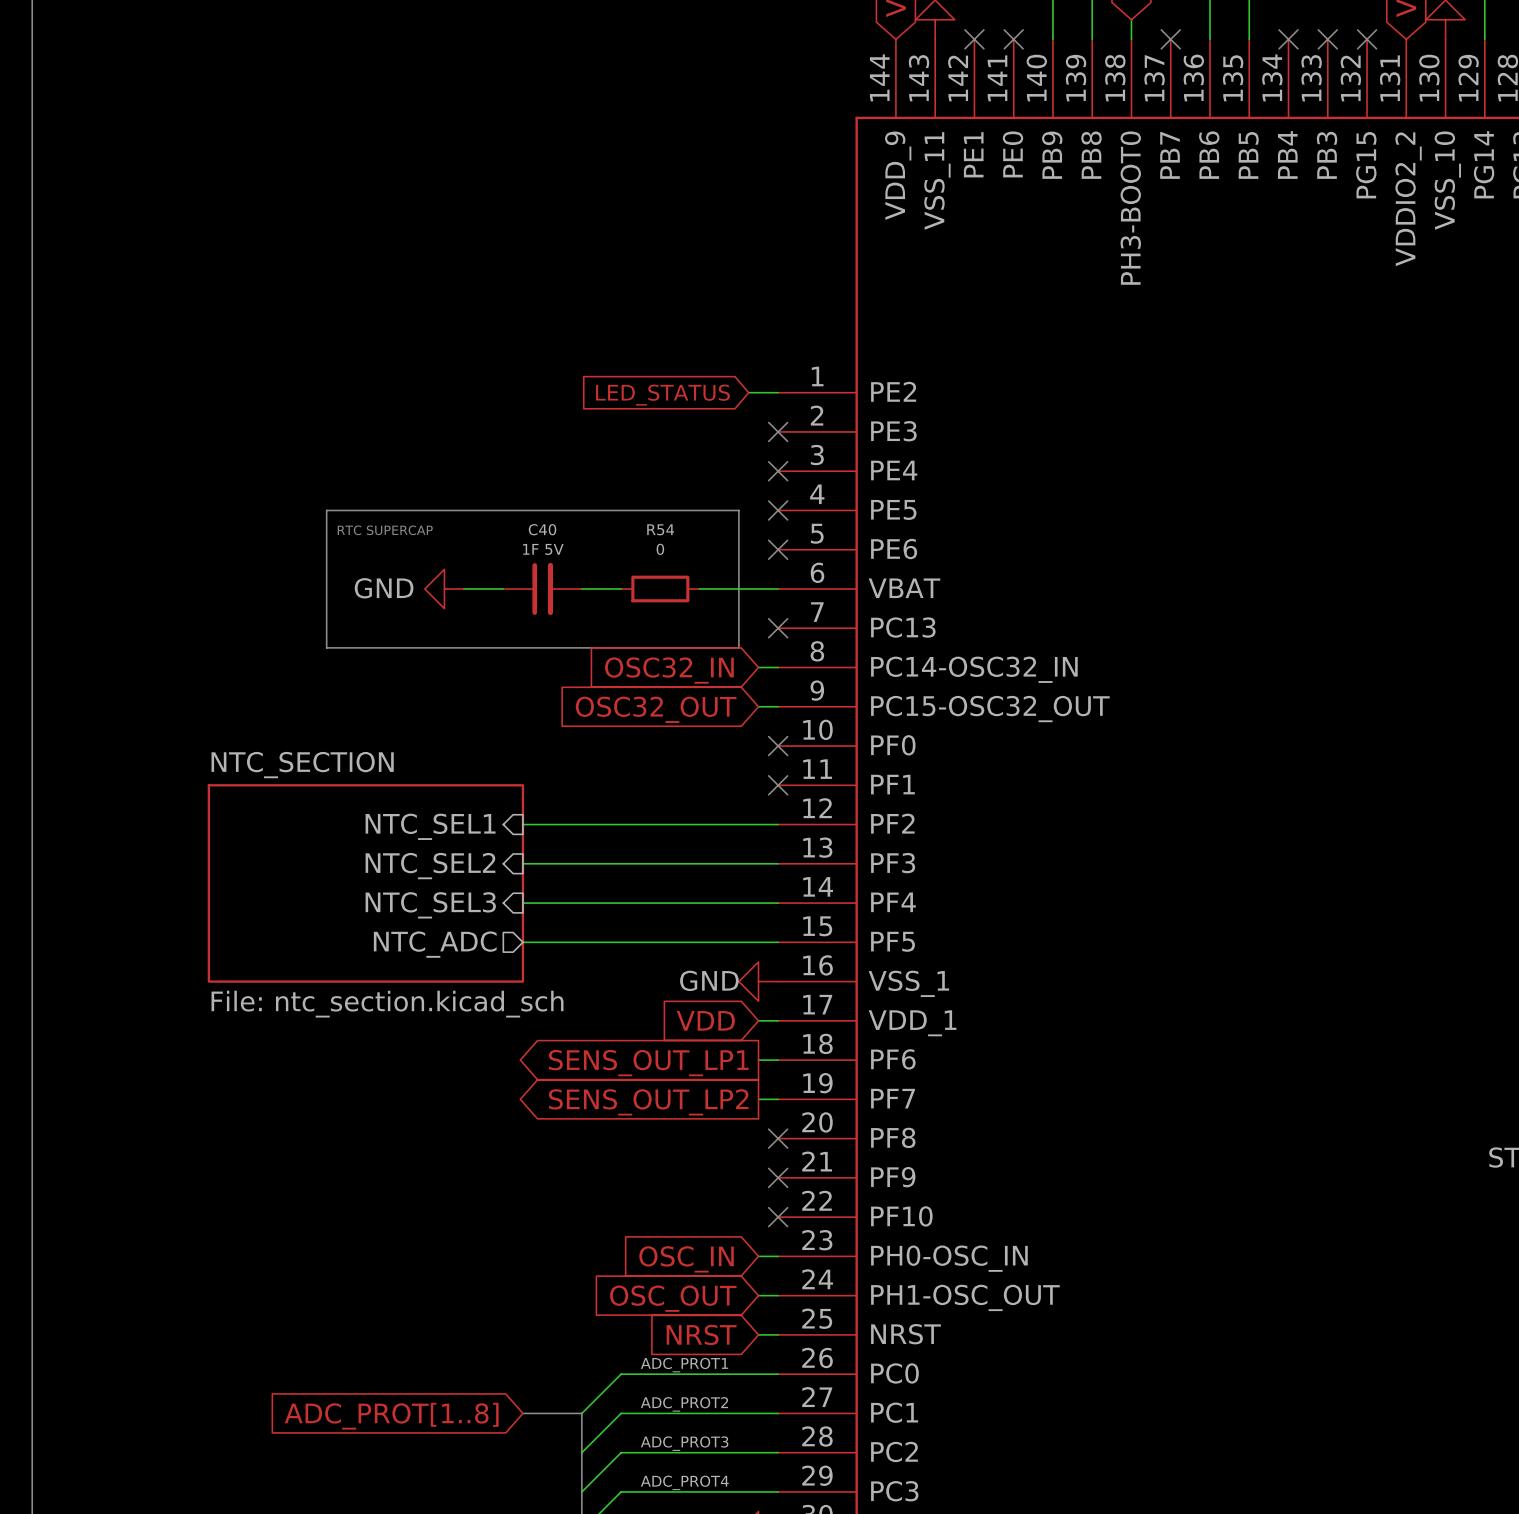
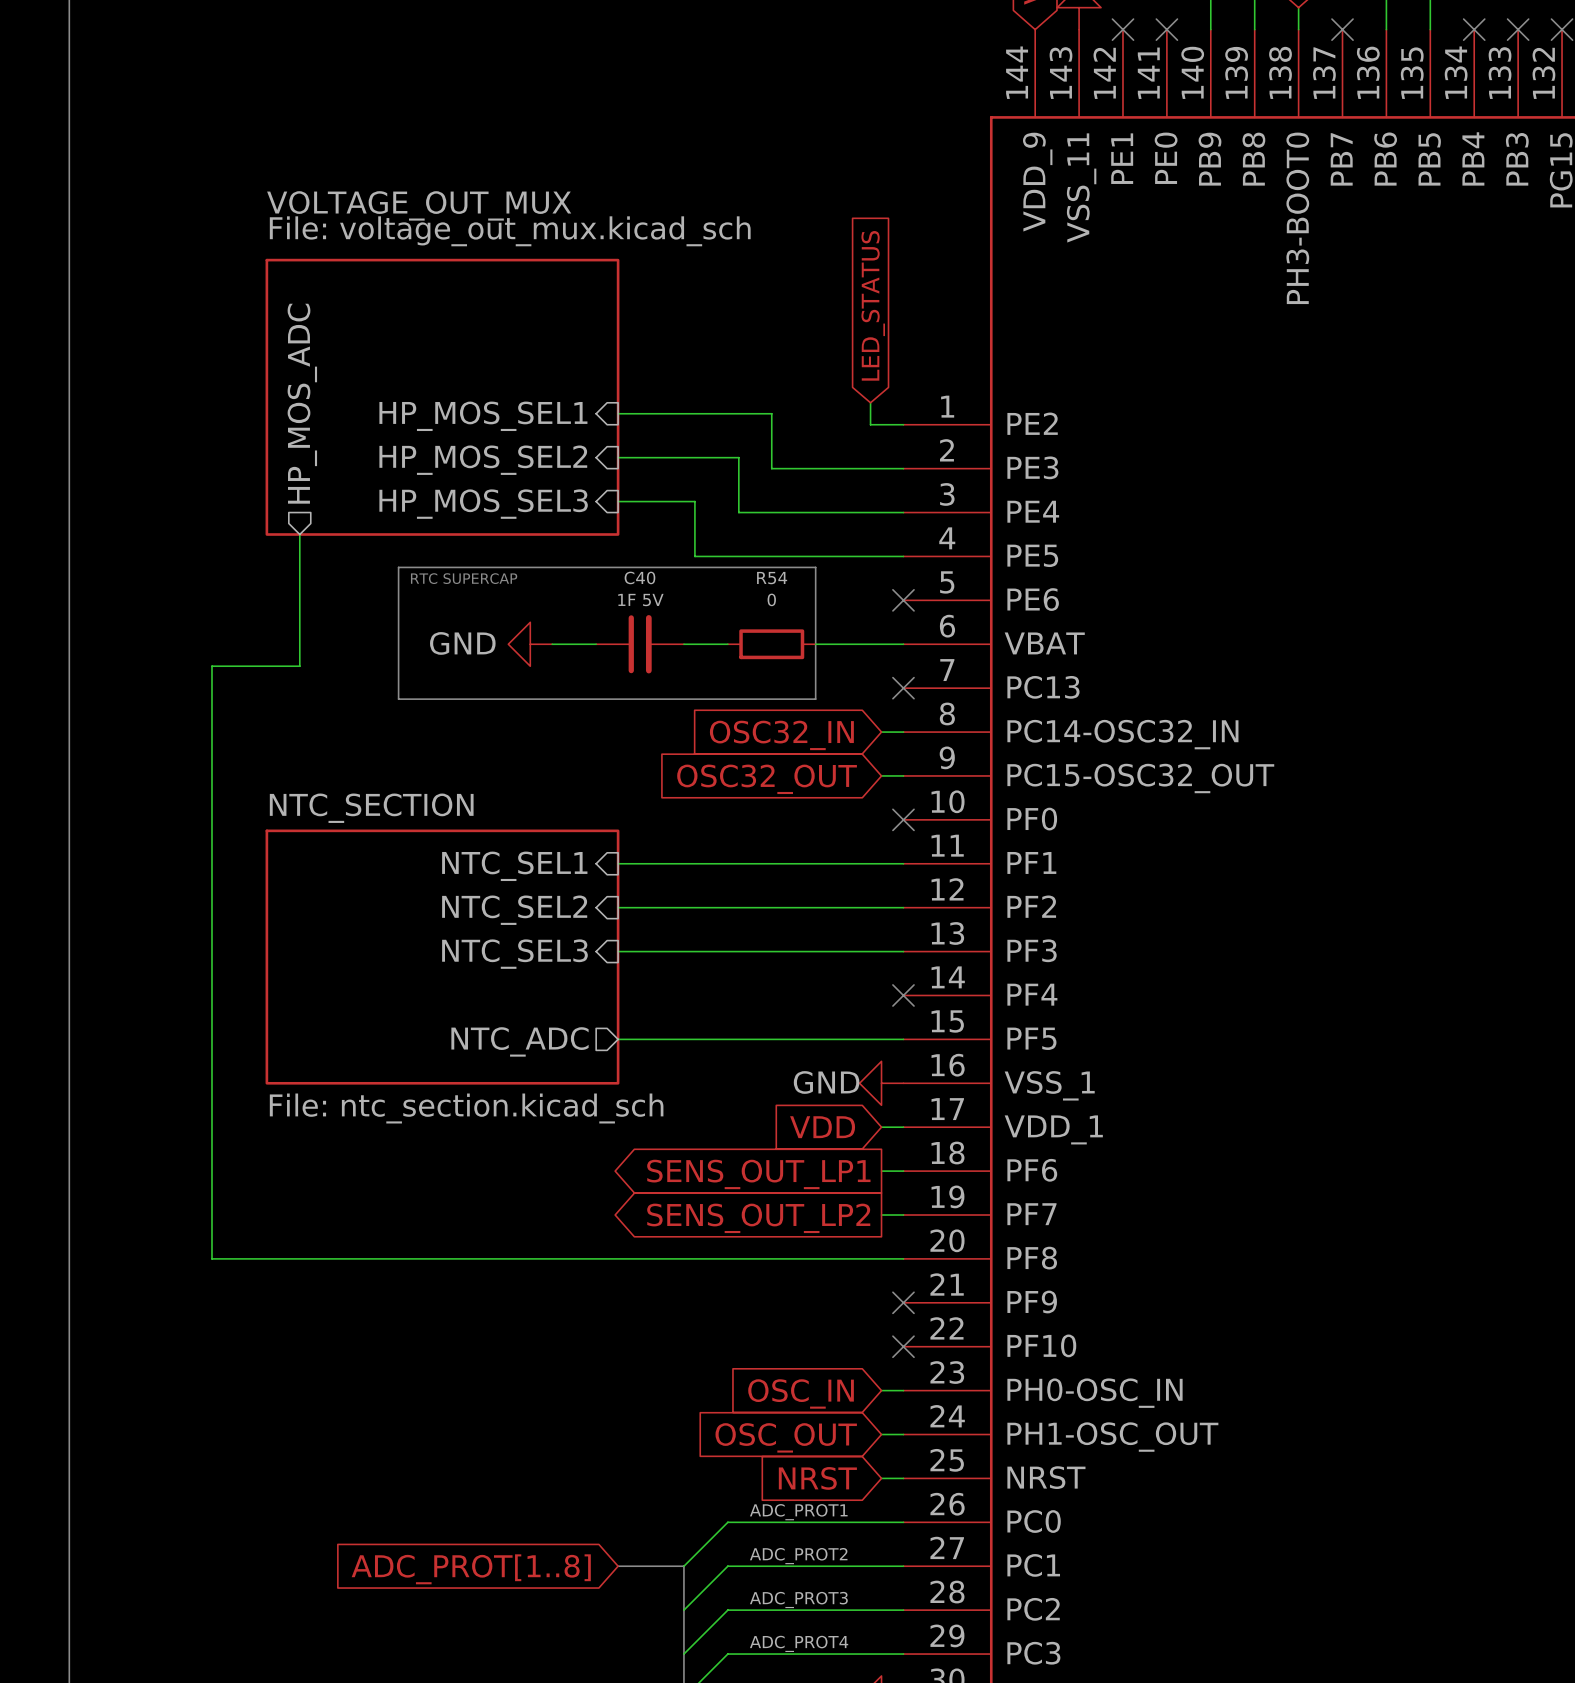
sheet VOLTAGE_OUT_MUX: none -> File: voltage_out_mux.kicad_sch (442, 397)
sheet pin: none -> HP_MOS_ADC (302, 403)
wire: none -> (870, 402) (870, 424)
wire: none -> (618, 413) (771, 413) (771, 468) (903, 468)
sheet pin: none -> HP_MOS_SEL1 (483, 416)
global label rotation: 0° (662, 395) -> 90° clockwise (873, 305)
wire: none -> (618, 457) (738, 457) (738, 512) (903, 512)
sheet pin: none -> HP_MOS_SEL2 (483, 460)
no-connect mark: (778, 431) -> none
wire: none -> (618, 501) (694, 501) (694, 556) (903, 556)
sheet pin: none -> HP_MOS_SEL3 (483, 504)
no-connect mark: (778, 471) -> none
wire: none -> (299, 534) (299, 666) (211, 666) (211, 1258) (903, 1258)
no-connect mark: (778, 510) -> none
line: (326, 520) (326, 510) (738, 510) (738, 647) (326, 647) (326, 638) -> (398, 567) (815, 567) (815, 699) (398, 699)
sheet NTC_SECTION shape: [207, 784, 525, 983] -> [265, 829, 620, 1085]
no-connect mark: (778, 785) -> none
sheet pin: none -> NTC_SEL1 (514, 866)
sheet pin: NTC_SEL1 (430, 826) -> NTC_SEL2 (514, 910)
sheet pin: NTC_SEL2 (430, 866) -> NTC_SEL3 (514, 954)
wire: (522, 903) (778, 903) -> (618, 863) (903, 863)
no-connect mark: none -> (903, 995)
sheet pin: NTC_SEL3 (430, 905) -> none
no-connect mark: (778, 1138) -> none

